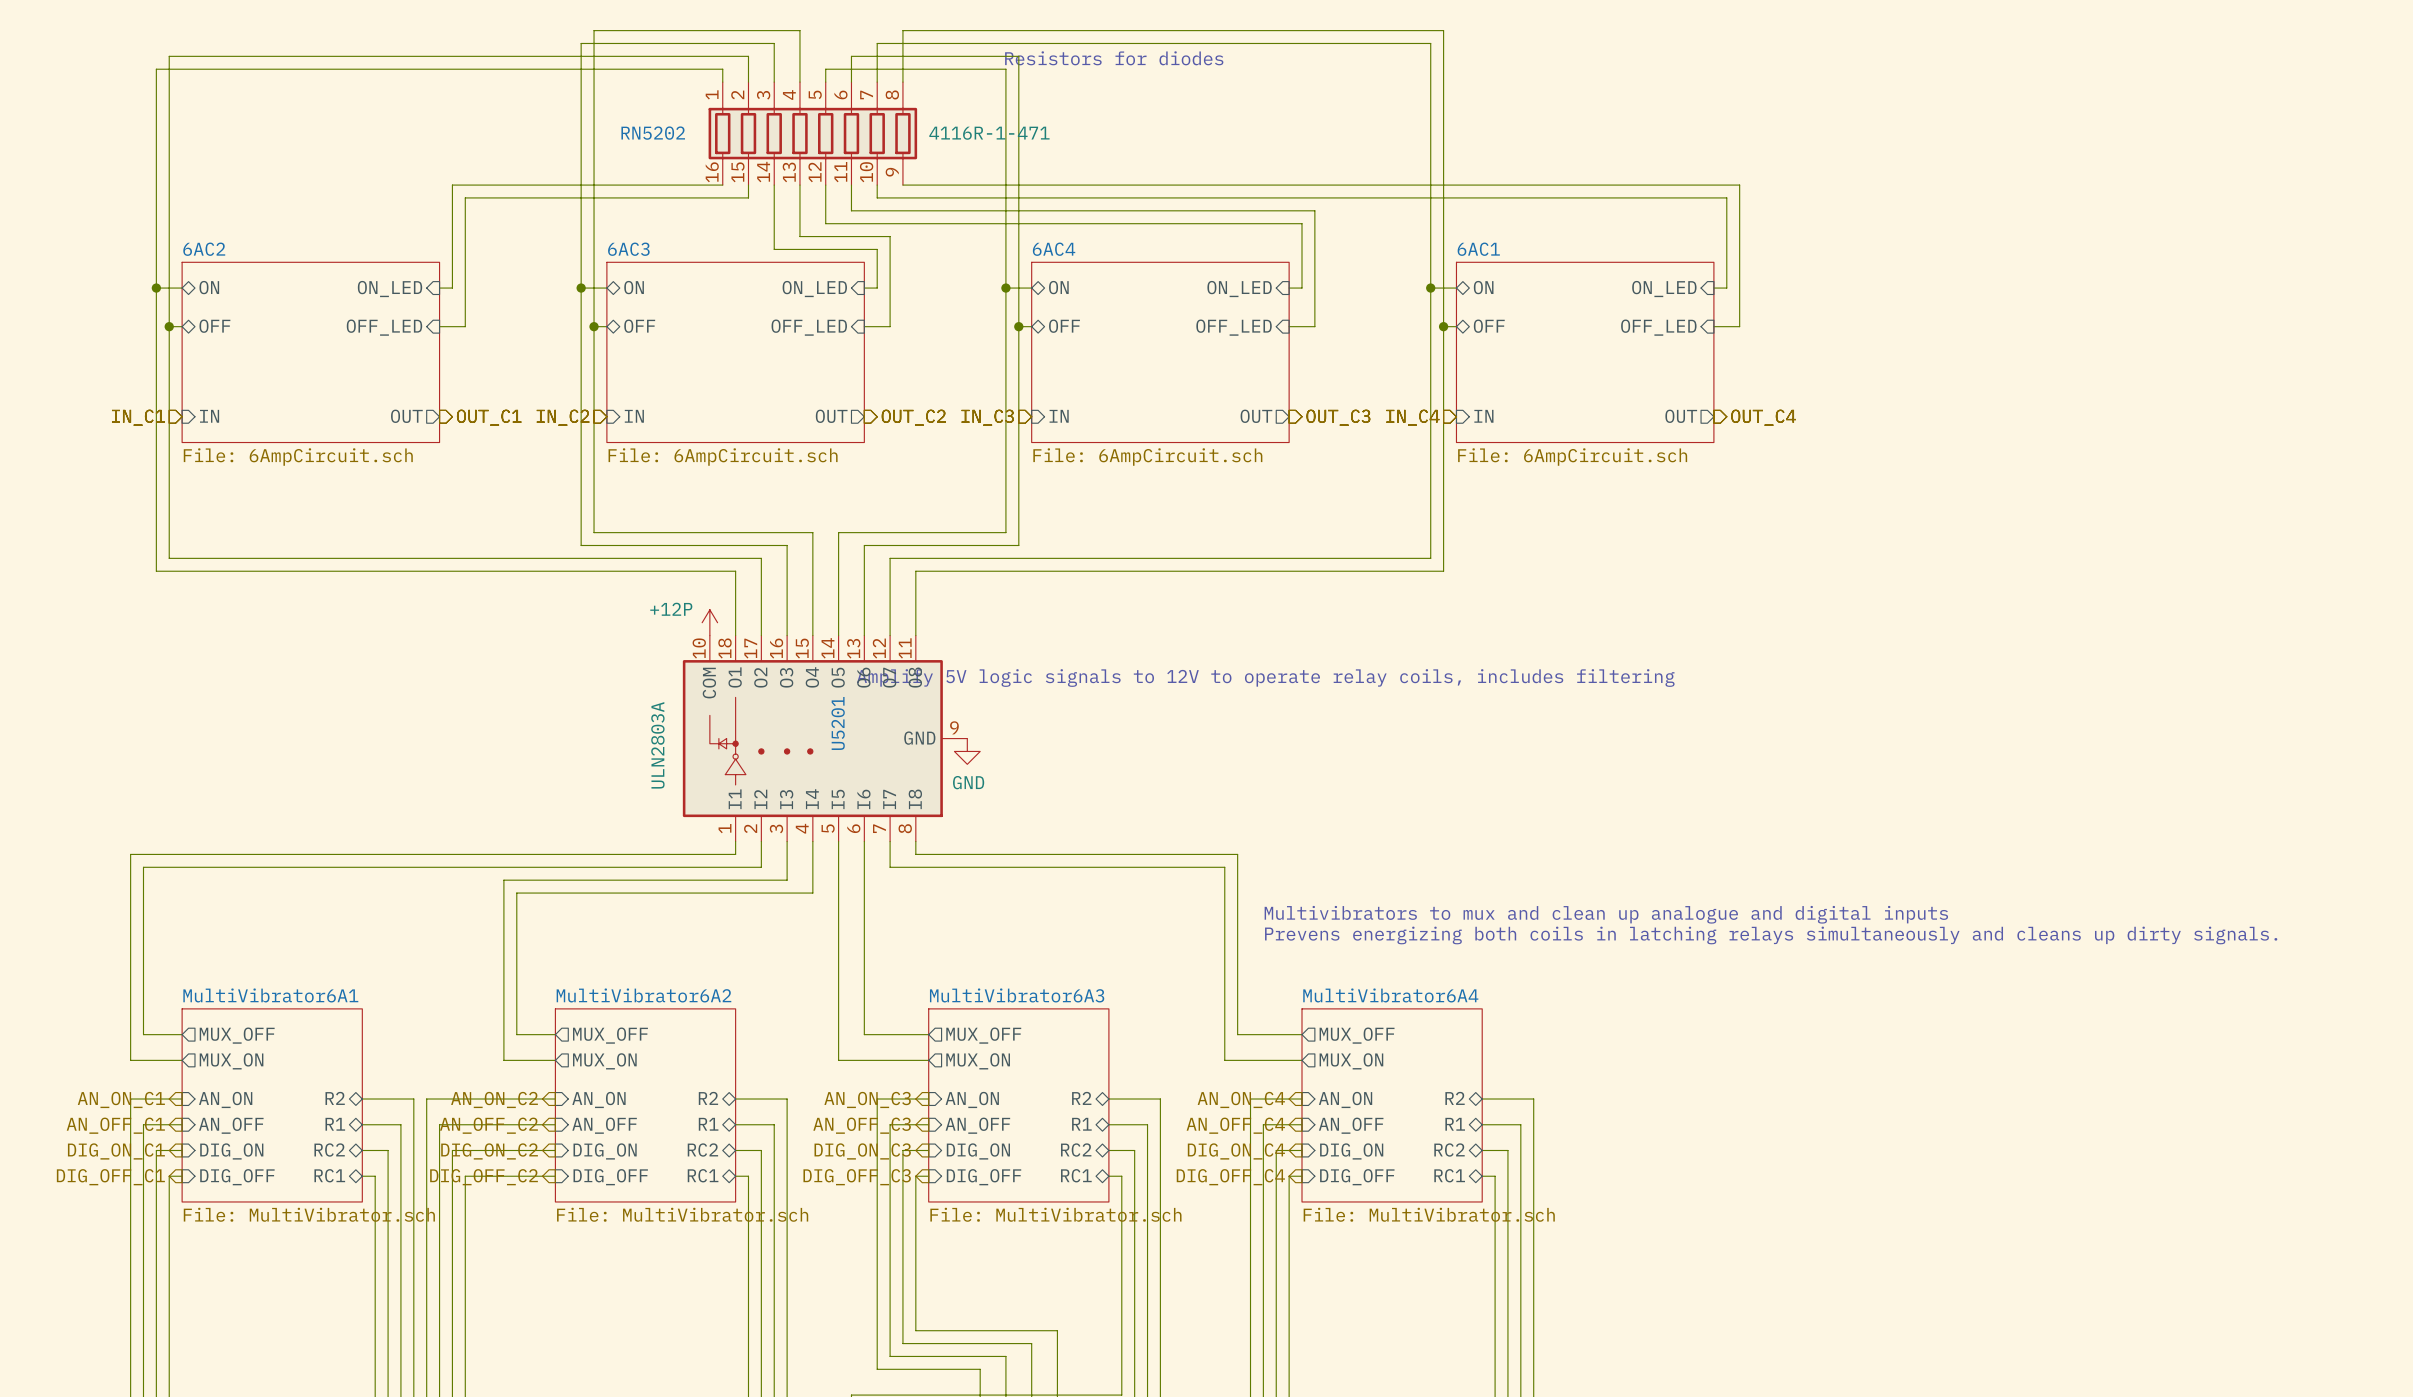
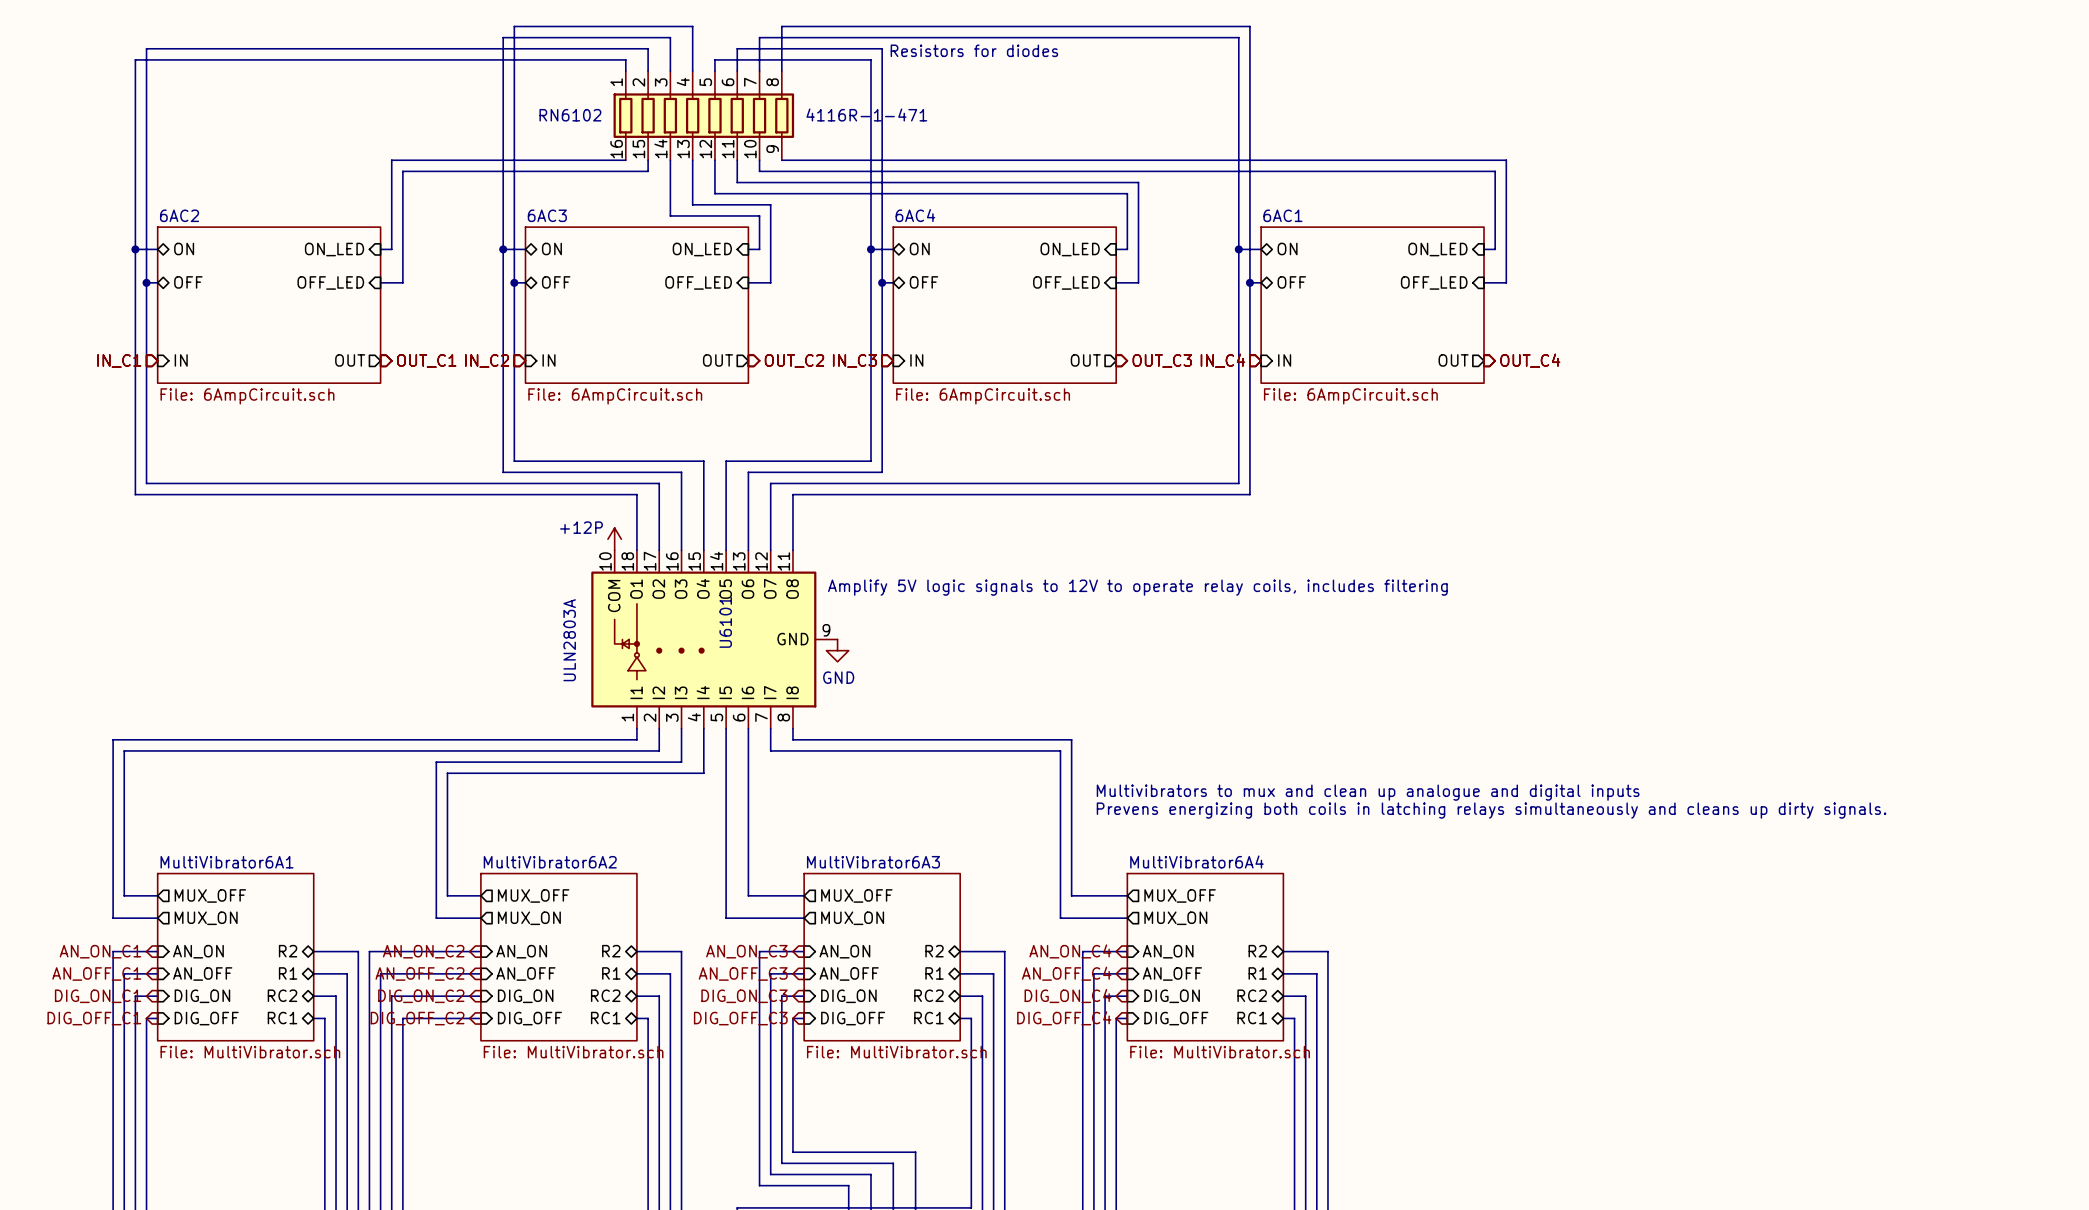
RN5202 name: RN5202 (653, 133) -> RN6102 (570, 115)
U5201 name: U5201 (838, 723) -> U6101 (725, 622)

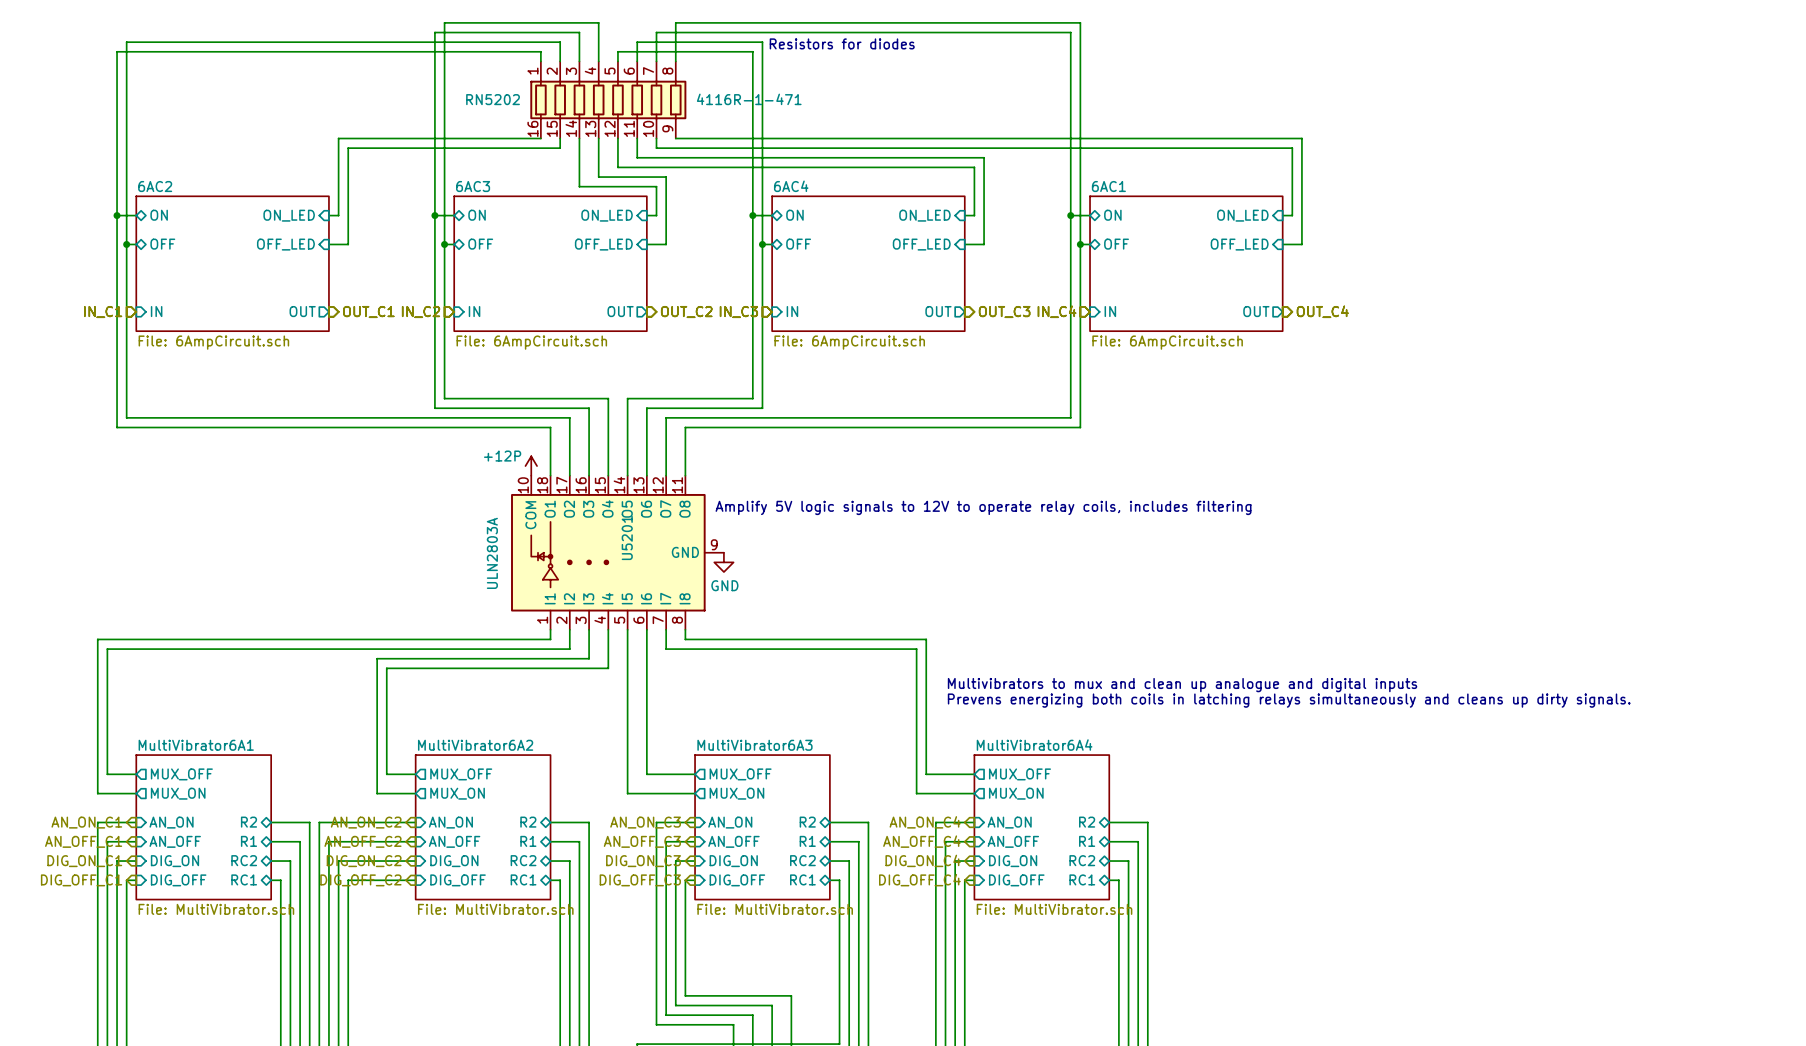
RN6102 name: RN6102 (570, 115) -> RN5202 (493, 99)
U6101 name: U6101 (725, 622) -> U5201 (627, 537)

